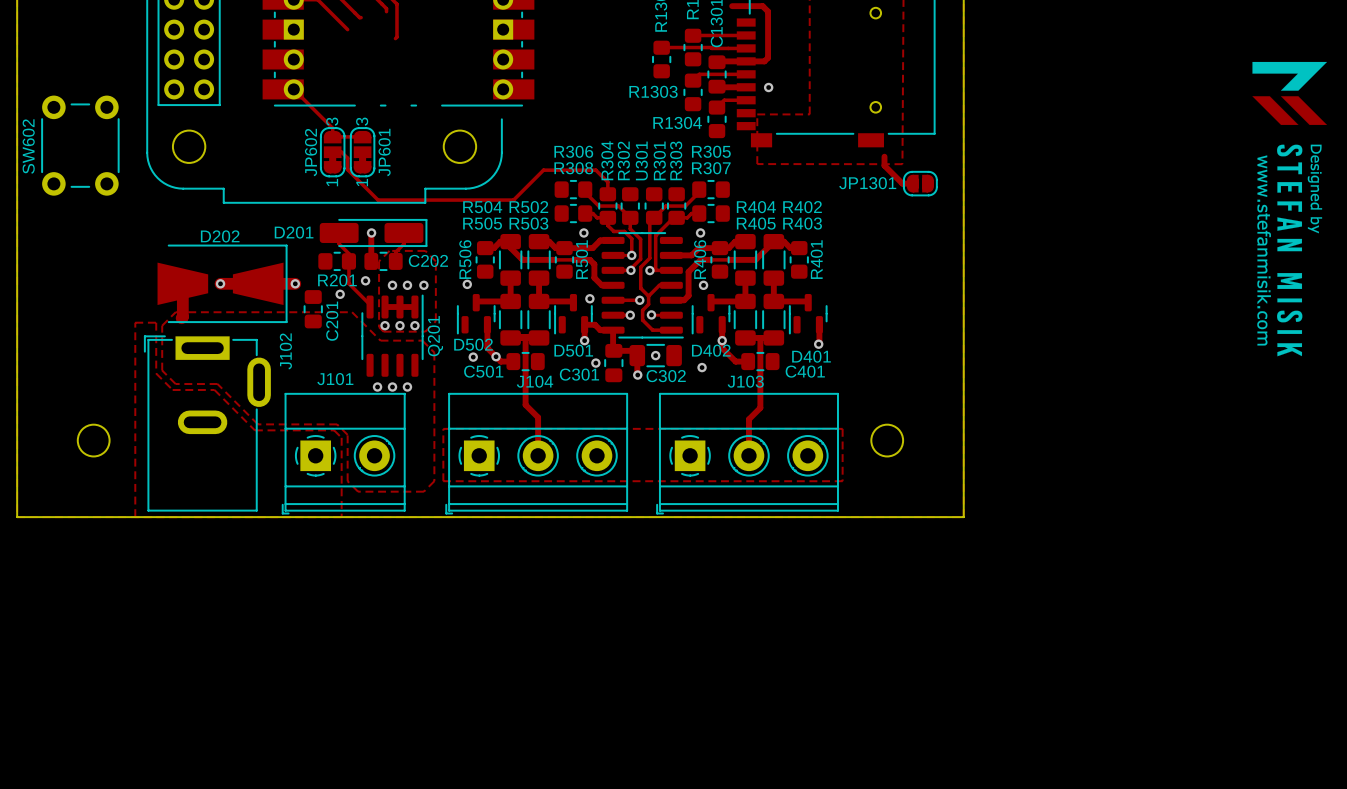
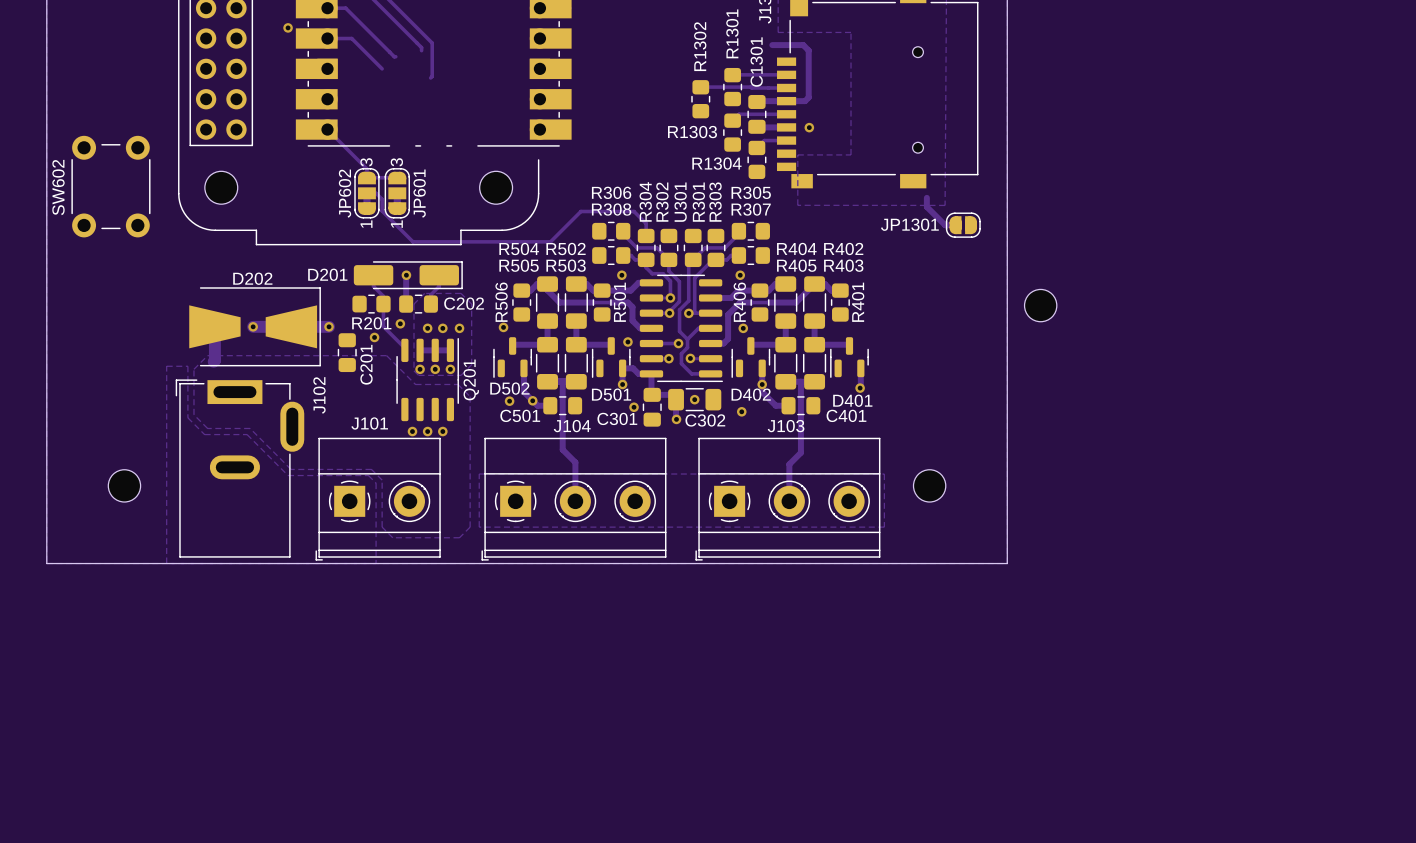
drawing: [1252, 61, 1328, 357] -> none
part: none -> (1040, 305)

